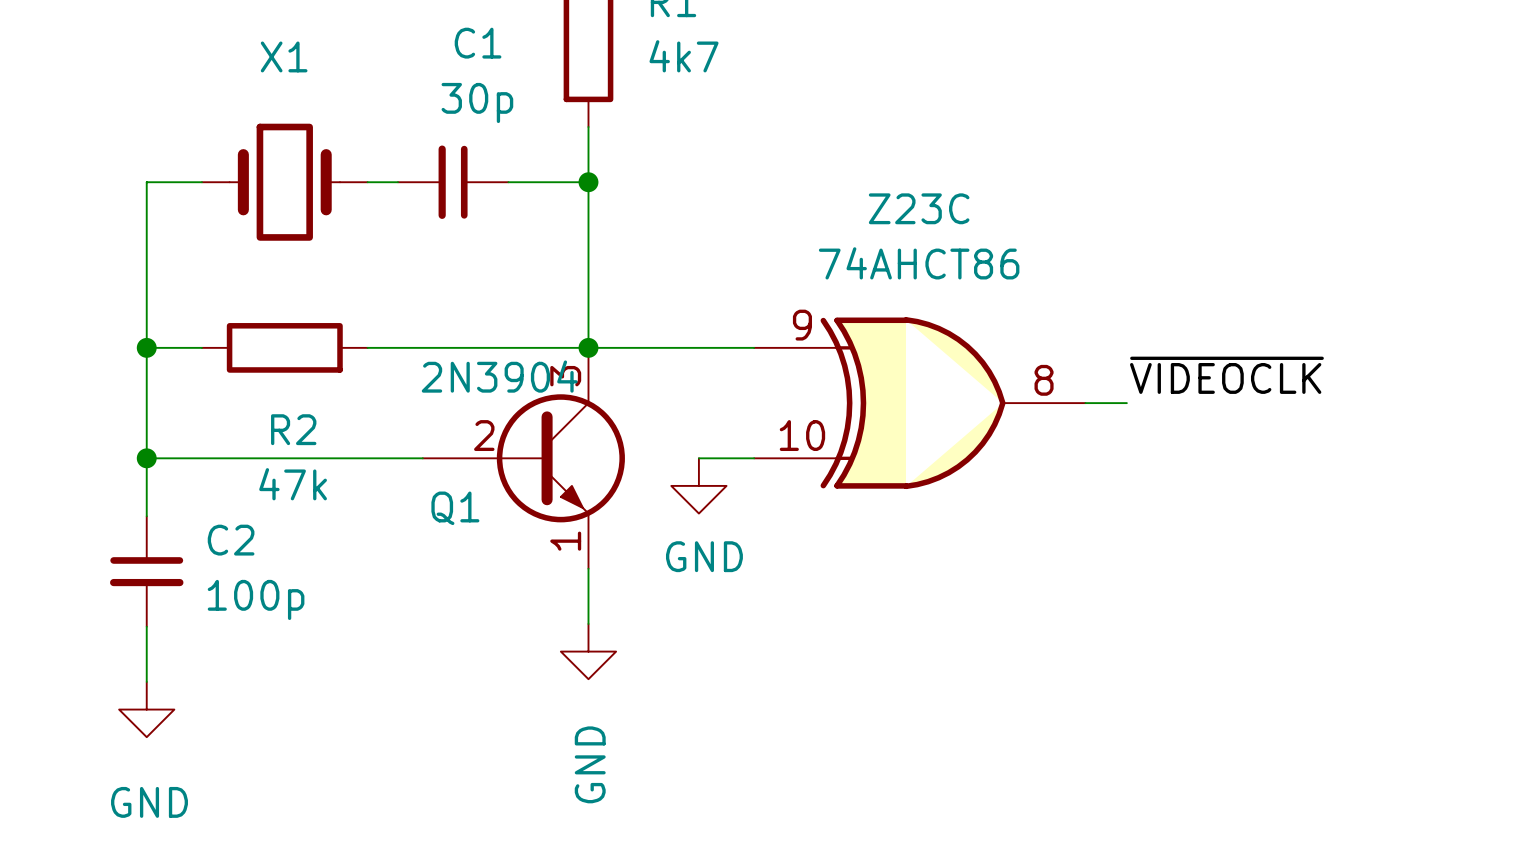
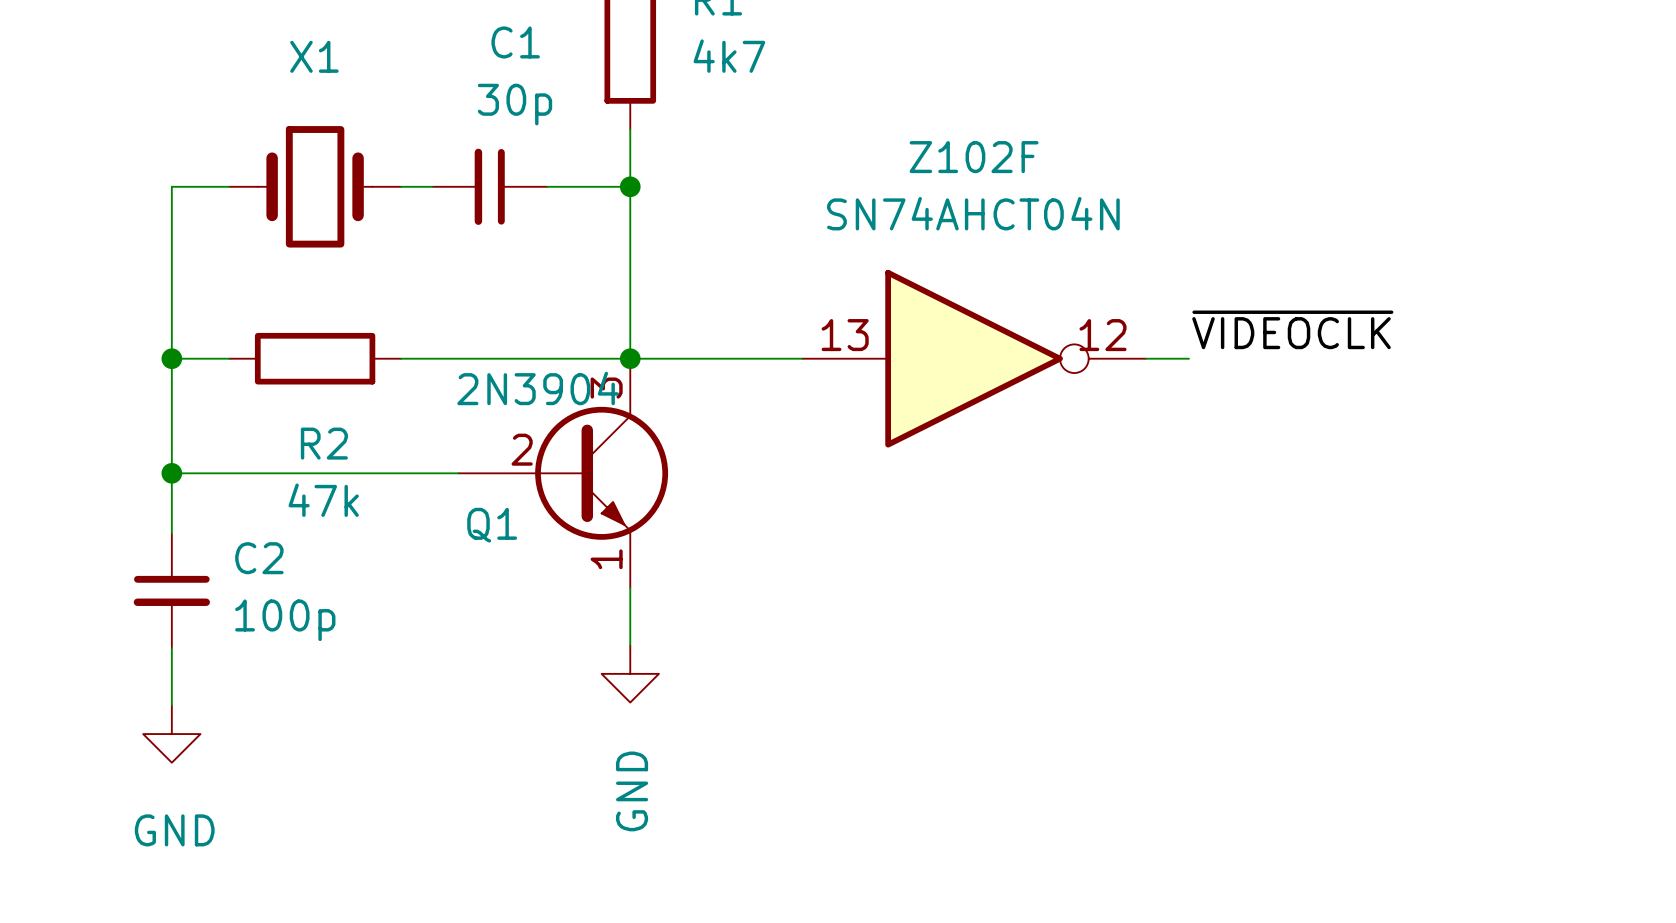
Z102F: none -> SN74AHCT04N (974, 358)
label position: ~{VIDEOCLK} (1226, 375) -> ~{VIDEOCLK} (1292, 329)
Z23C: 74AHCT86 (919, 403) -> none
wire: (1085, 403) (1126, 403) -> (1145, 358) (1188, 358)
wire: (698, 458) (754, 458) -> none
power symbol: GND (698, 485) -> none

